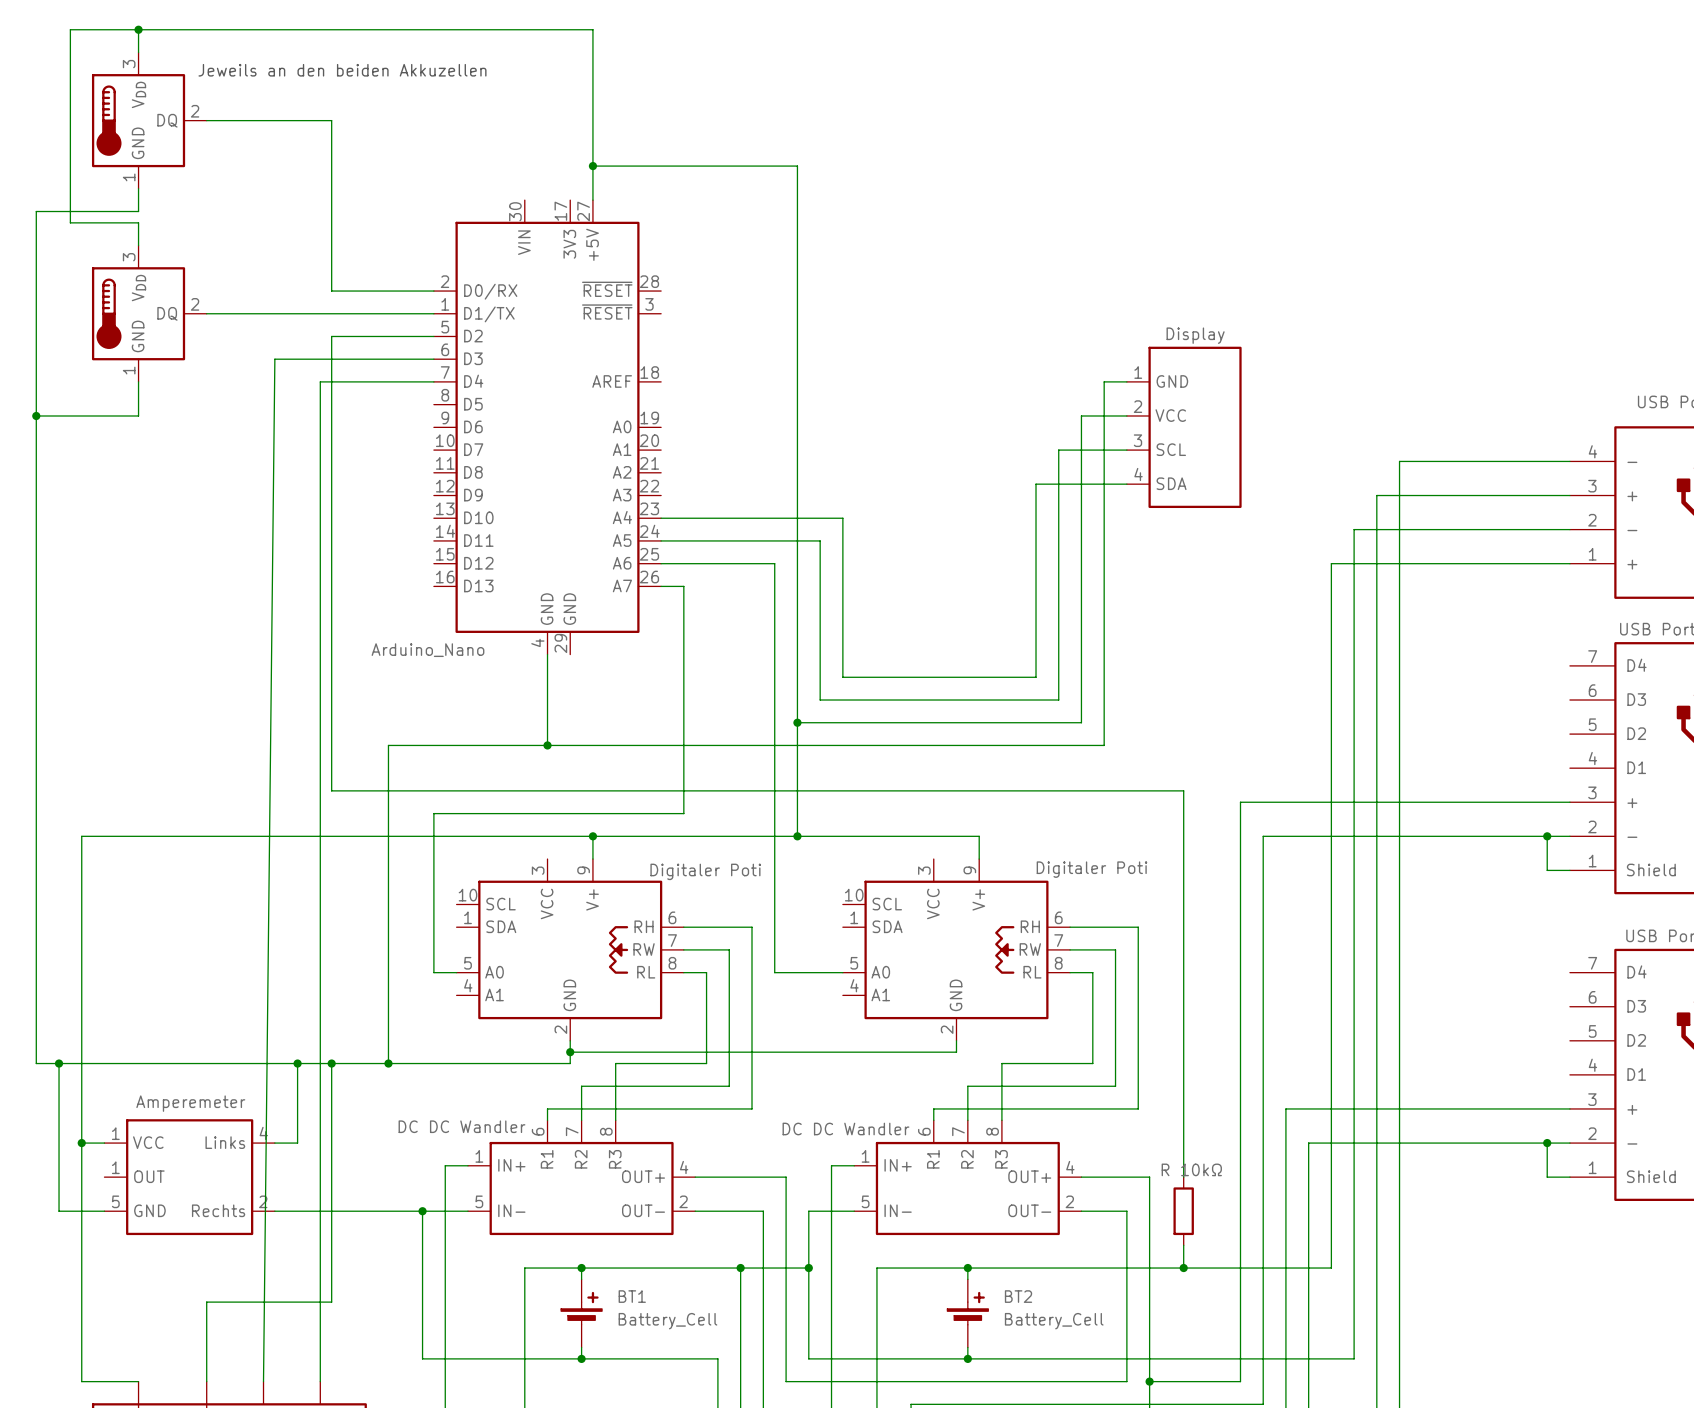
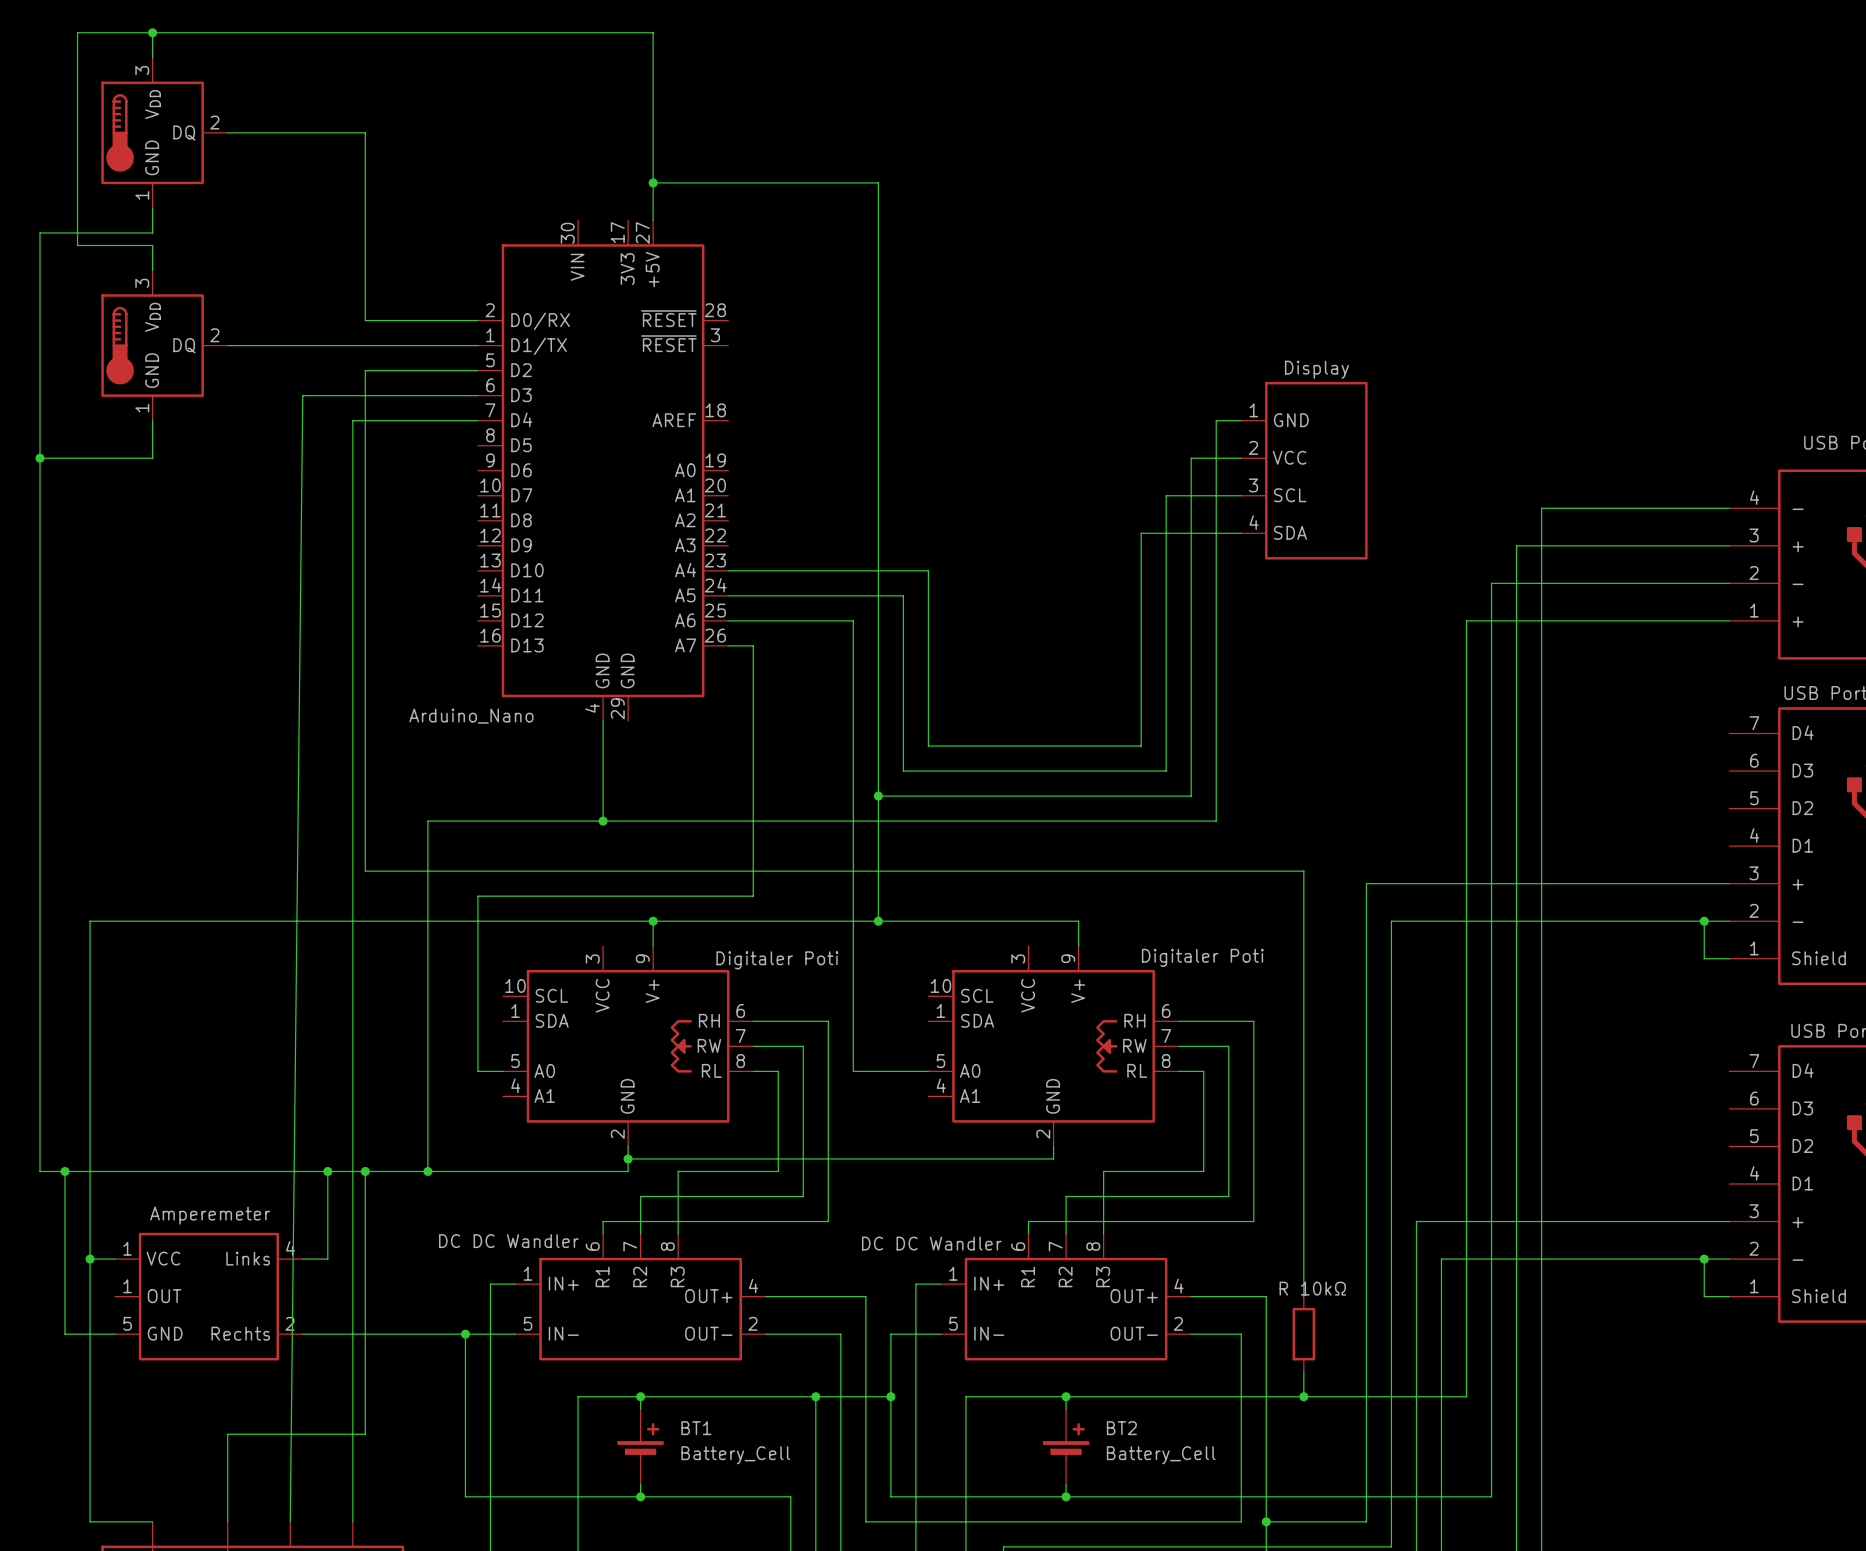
text: Jeweils an den beiden Akkuzellen (342, 70) -> none

